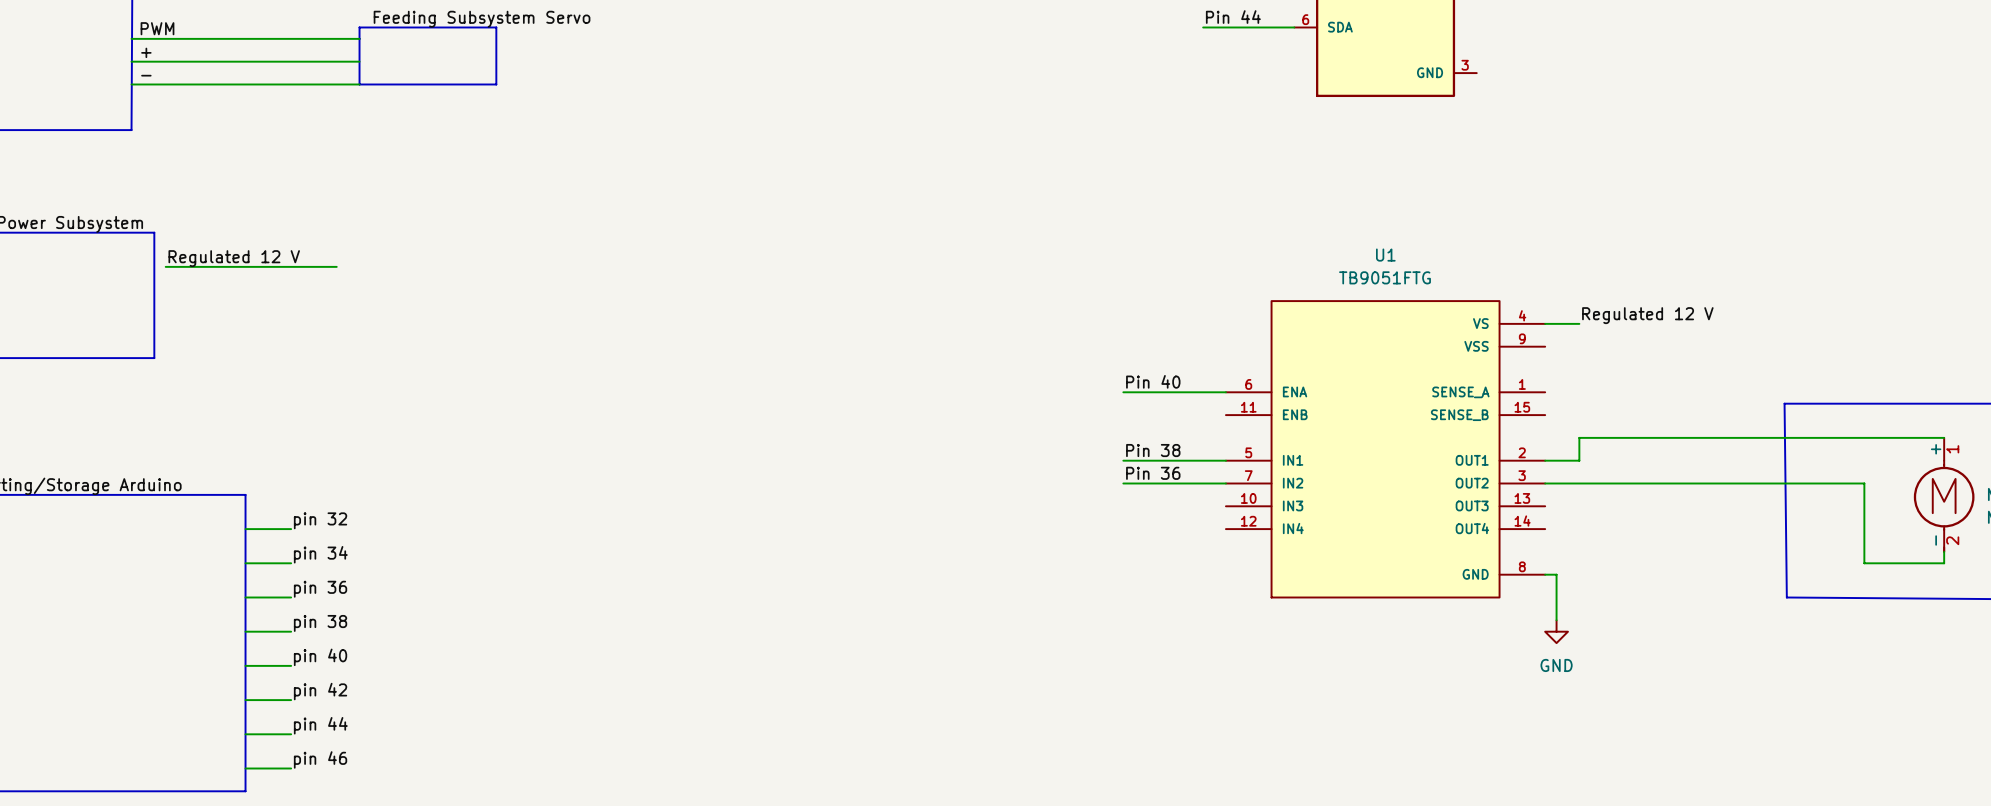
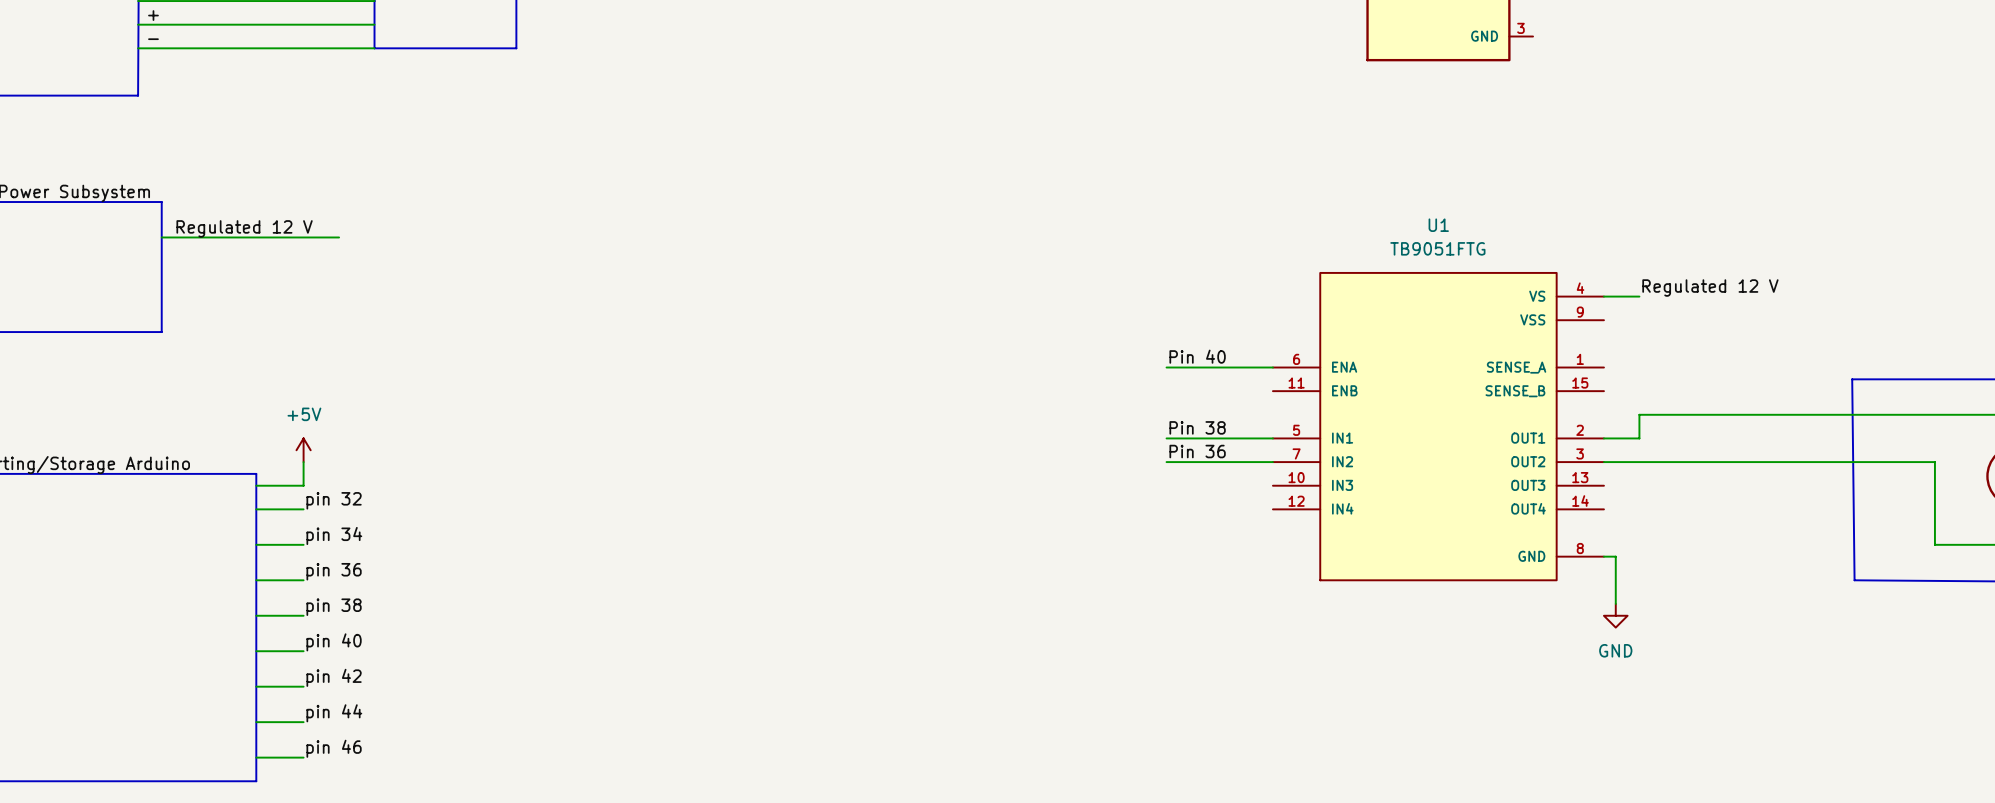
wire: (325, 266) (336, 266) -> (161, 237) (173, 237)
power symbol: none -> +5V (303, 450)
wire: none -> (303, 462) (303, 485) (256, 485)

